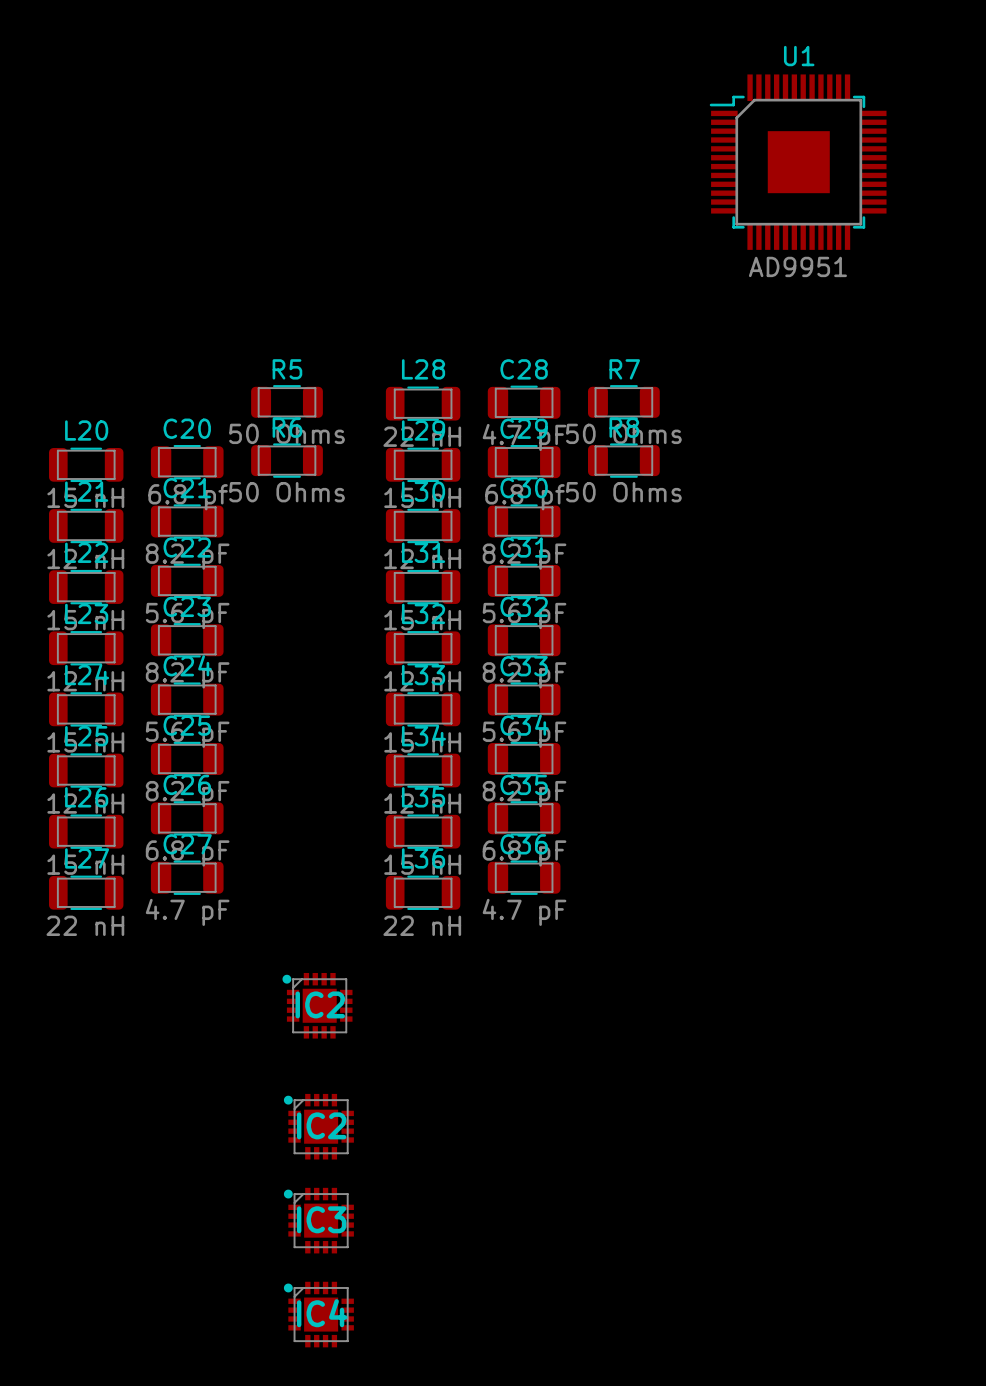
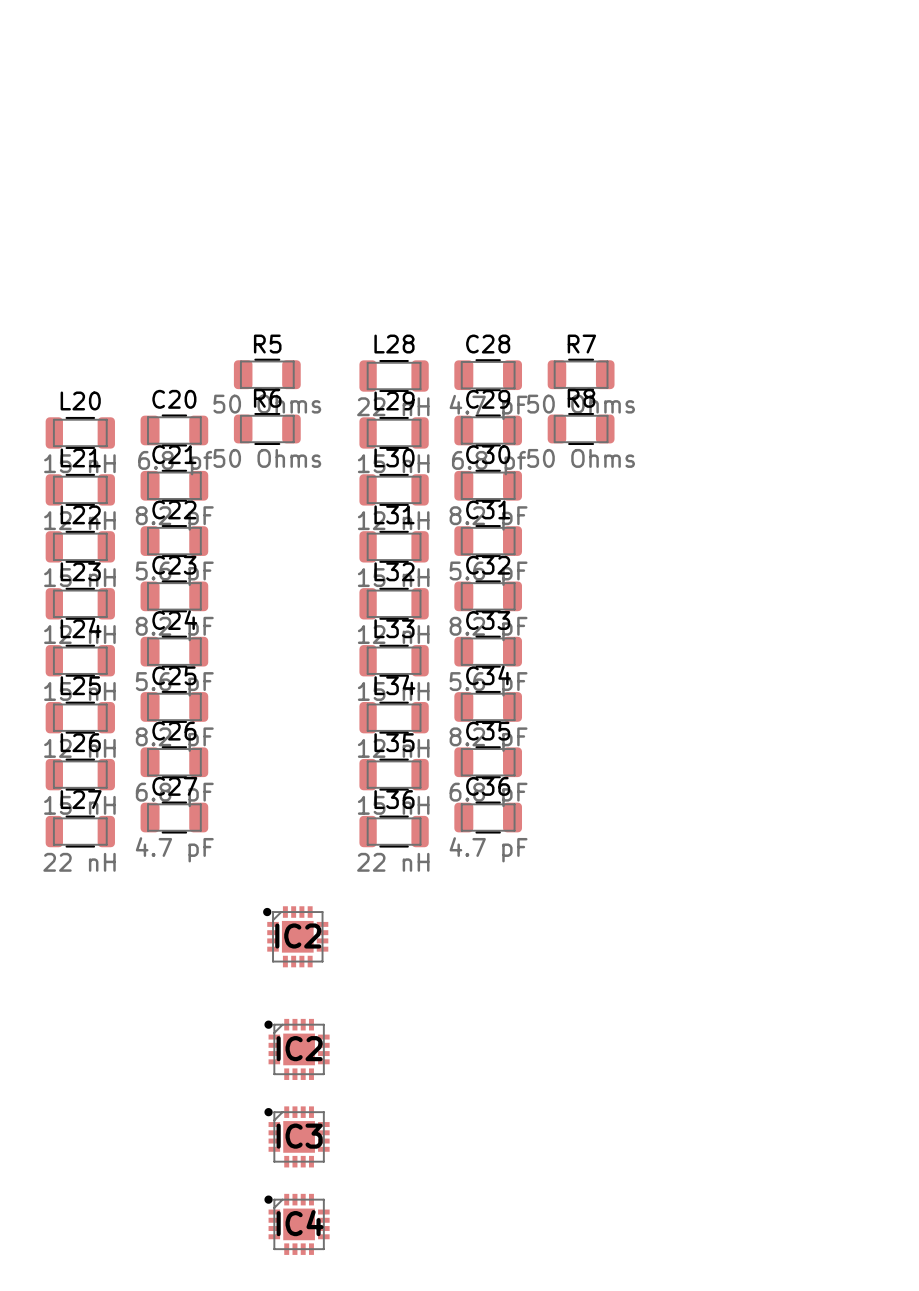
U1: AD9951 (798, 162) -> none

